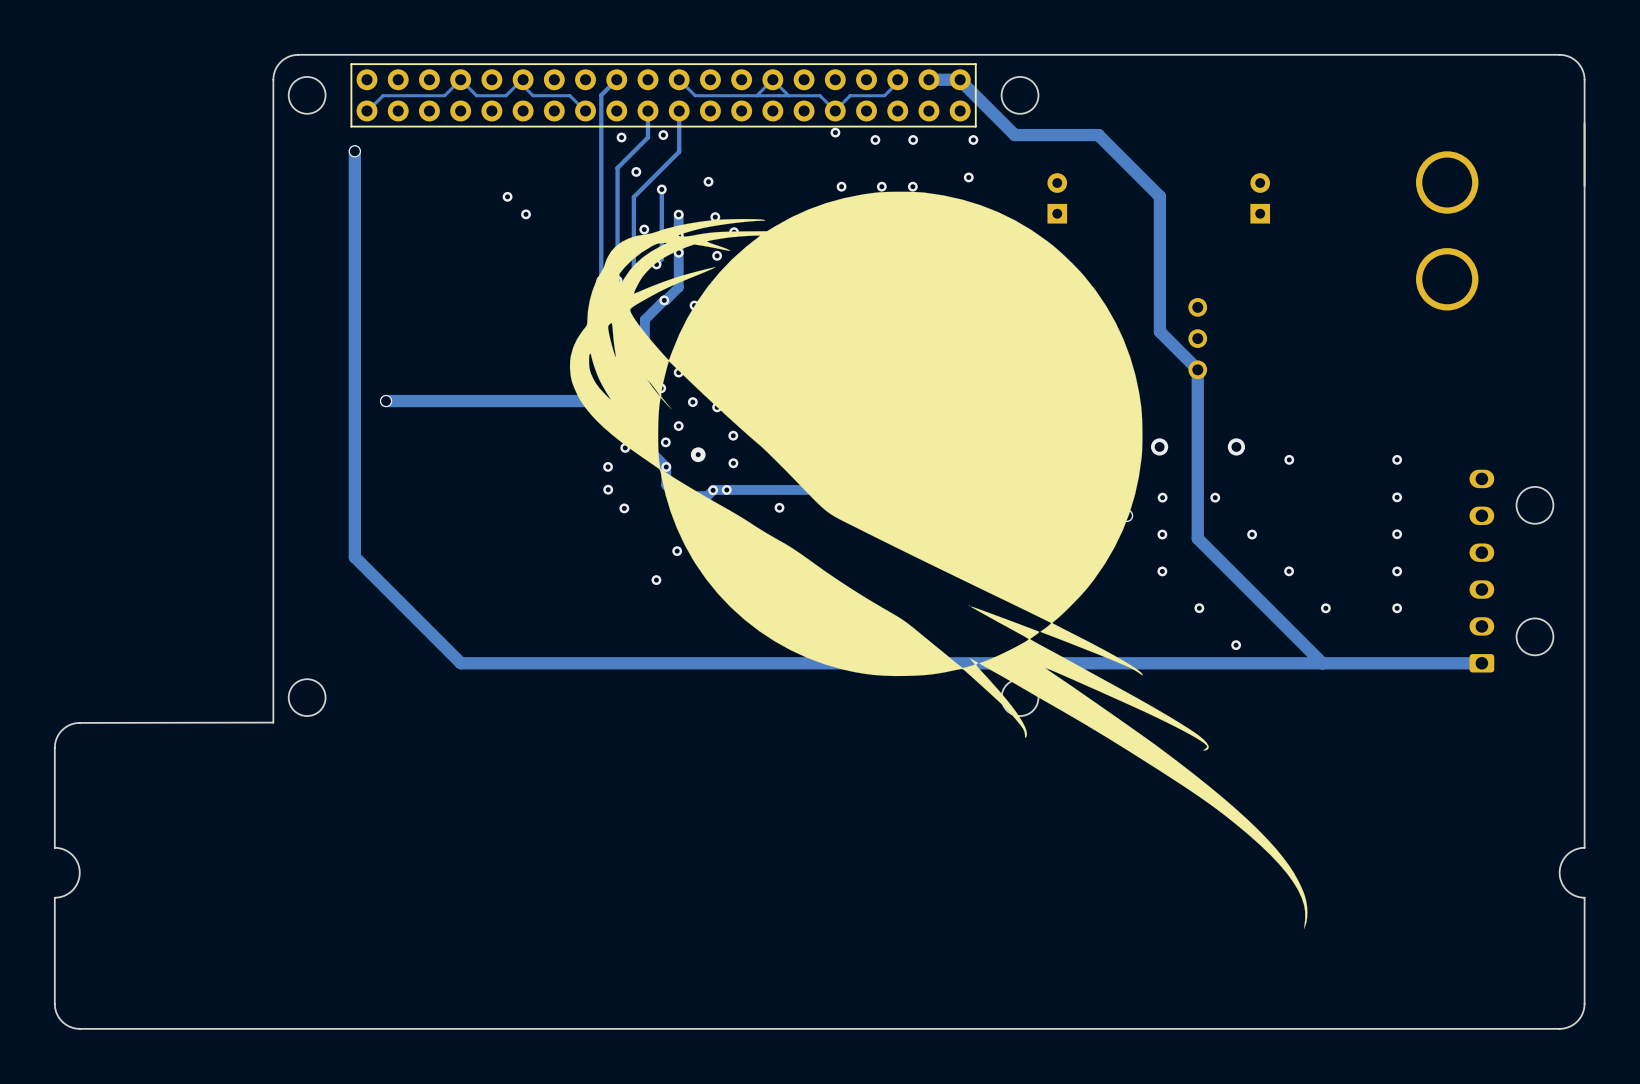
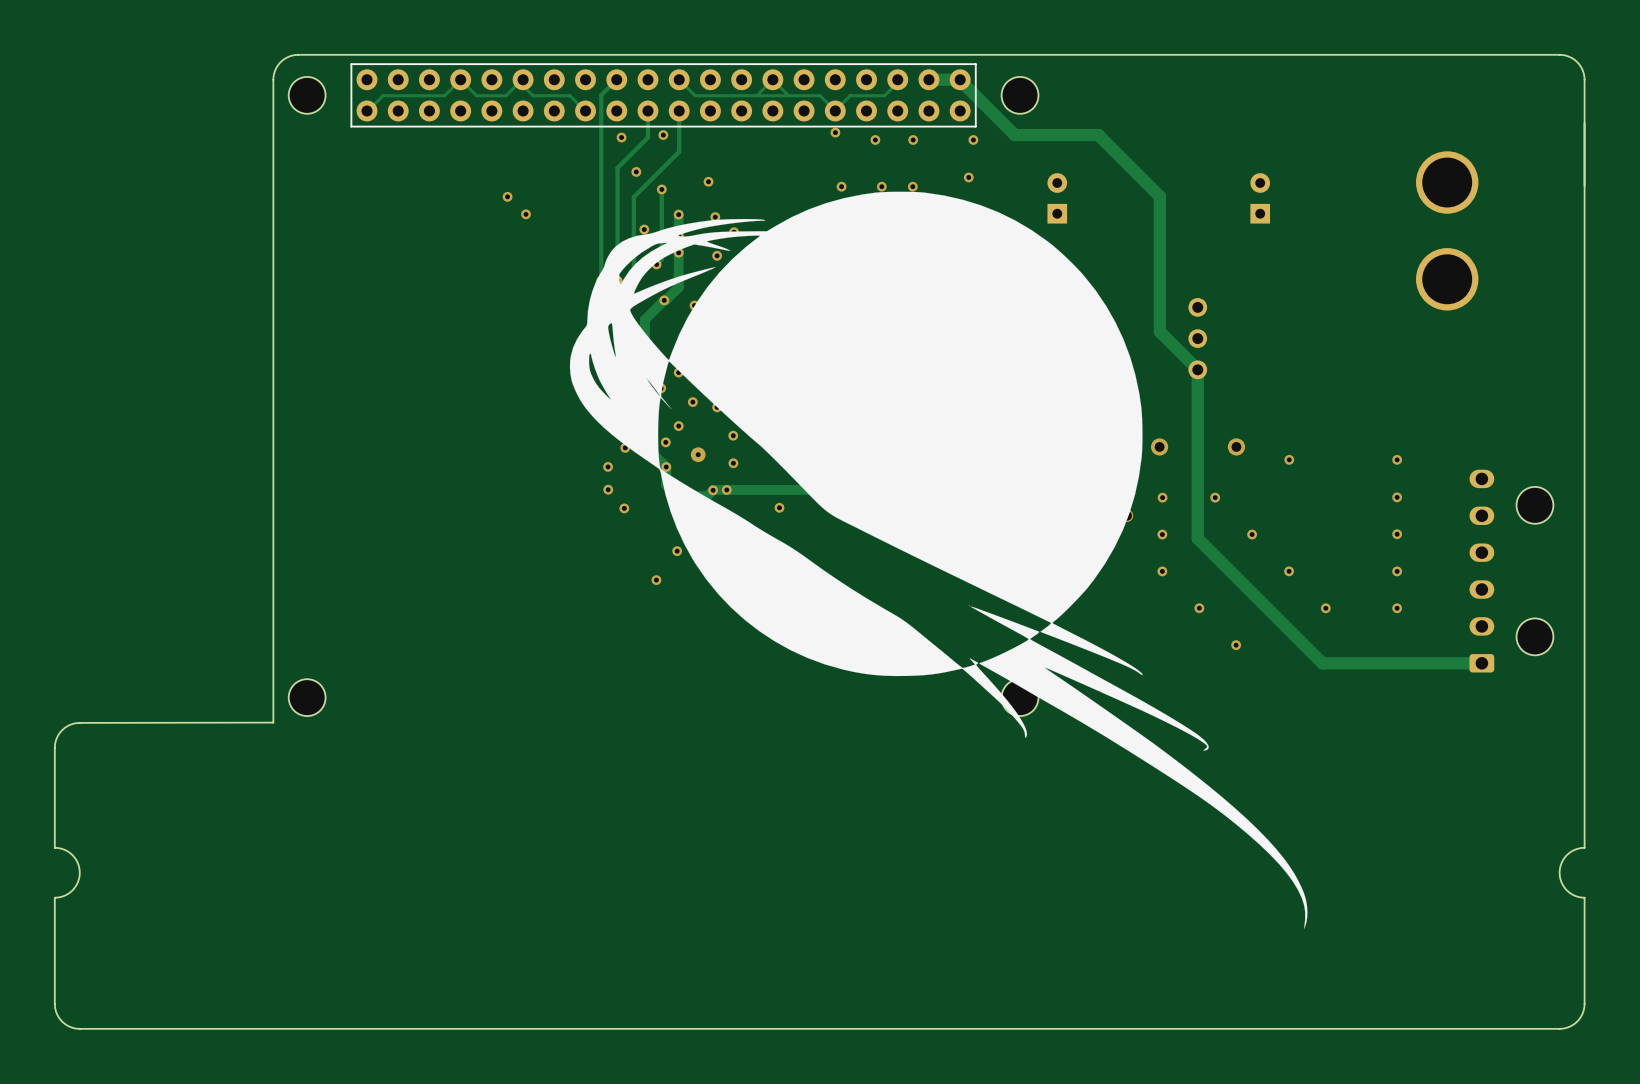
track: (354, 151) (354, 557) (460, 663) (1322, 663) -> none
via: (354, 151) -> none
track: (386, 401) (600, 401) (644, 445) -> none
via: (386, 401) -> none

